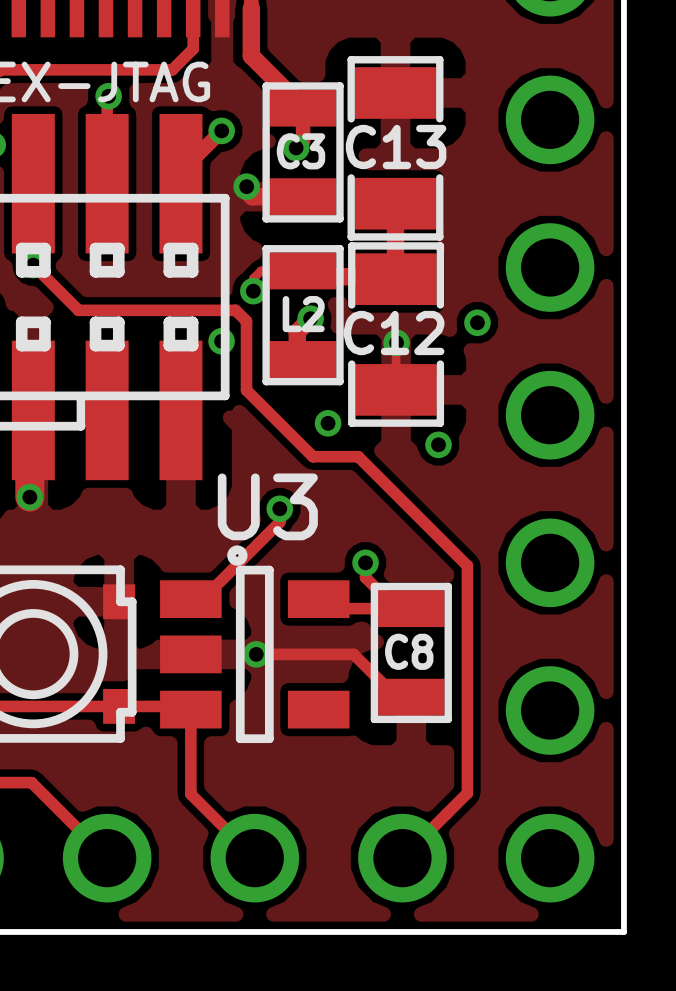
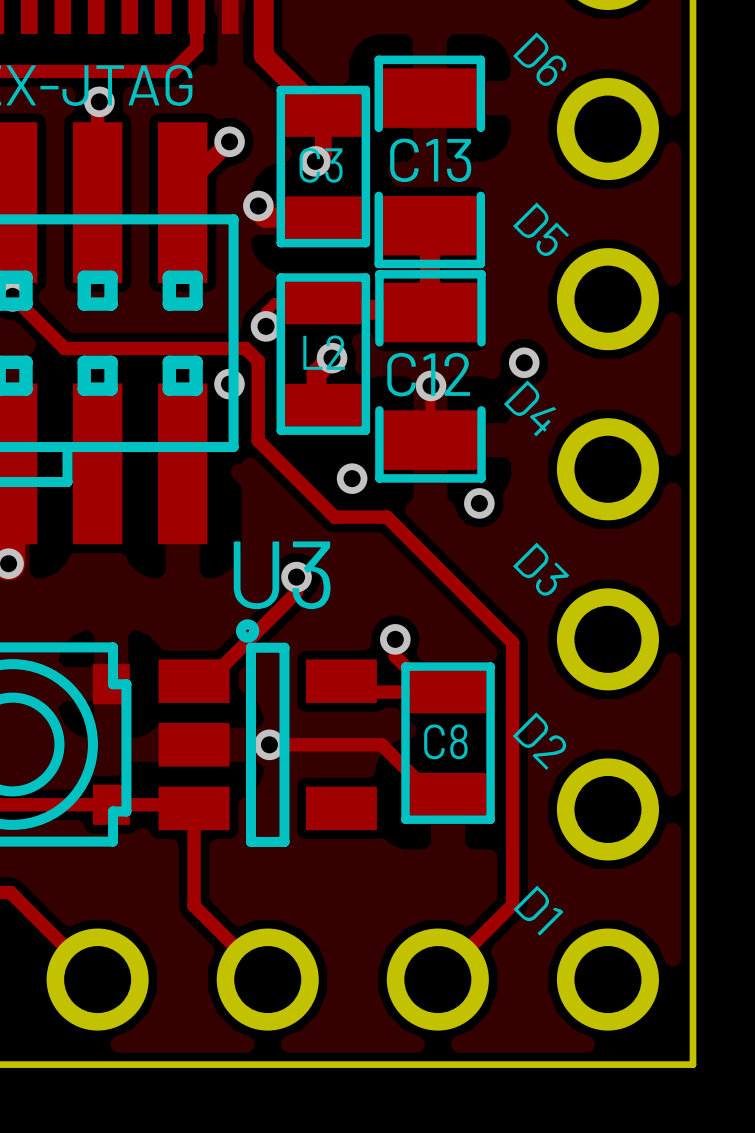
text: none -> D6 (539, 59)
text: none -> D5 (541, 229)
text: none -> D4 (530, 408)
text: none -> D3 (541, 569)
text: none -> D2 (539, 741)
text: none -> D1 (538, 910)

